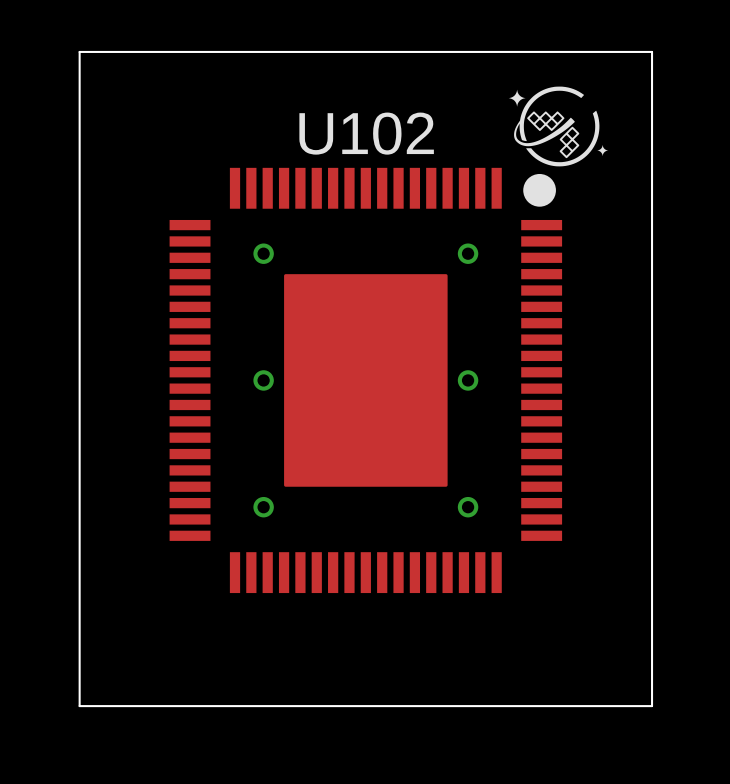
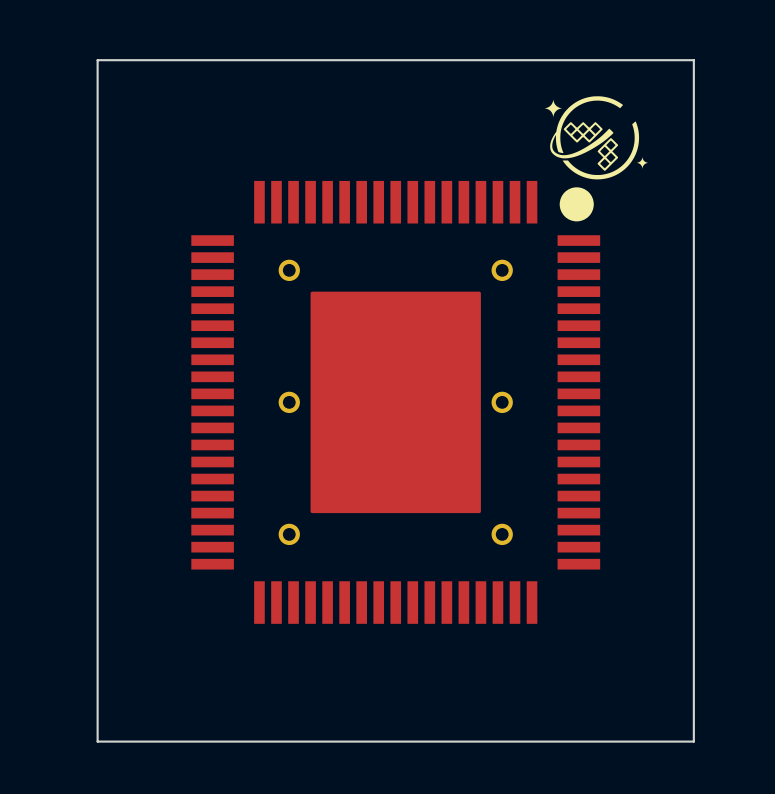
U102 name: U102 (366, 133) -> none

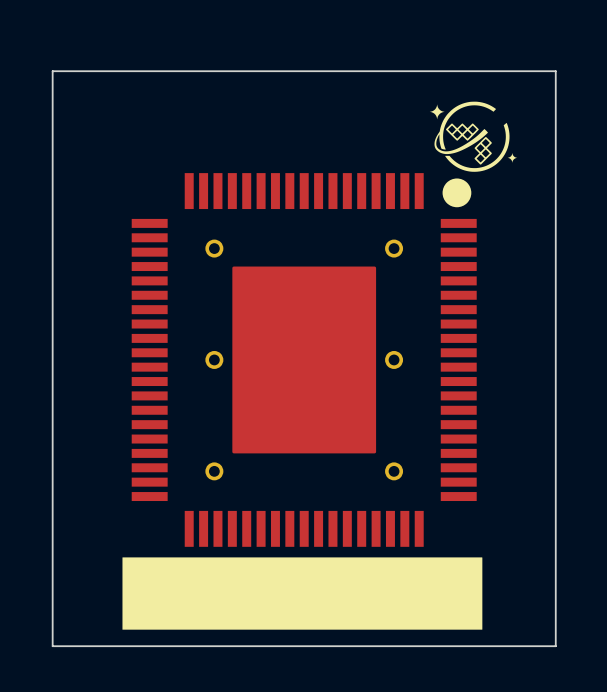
drawing: none -> [122, 557, 483, 630]

